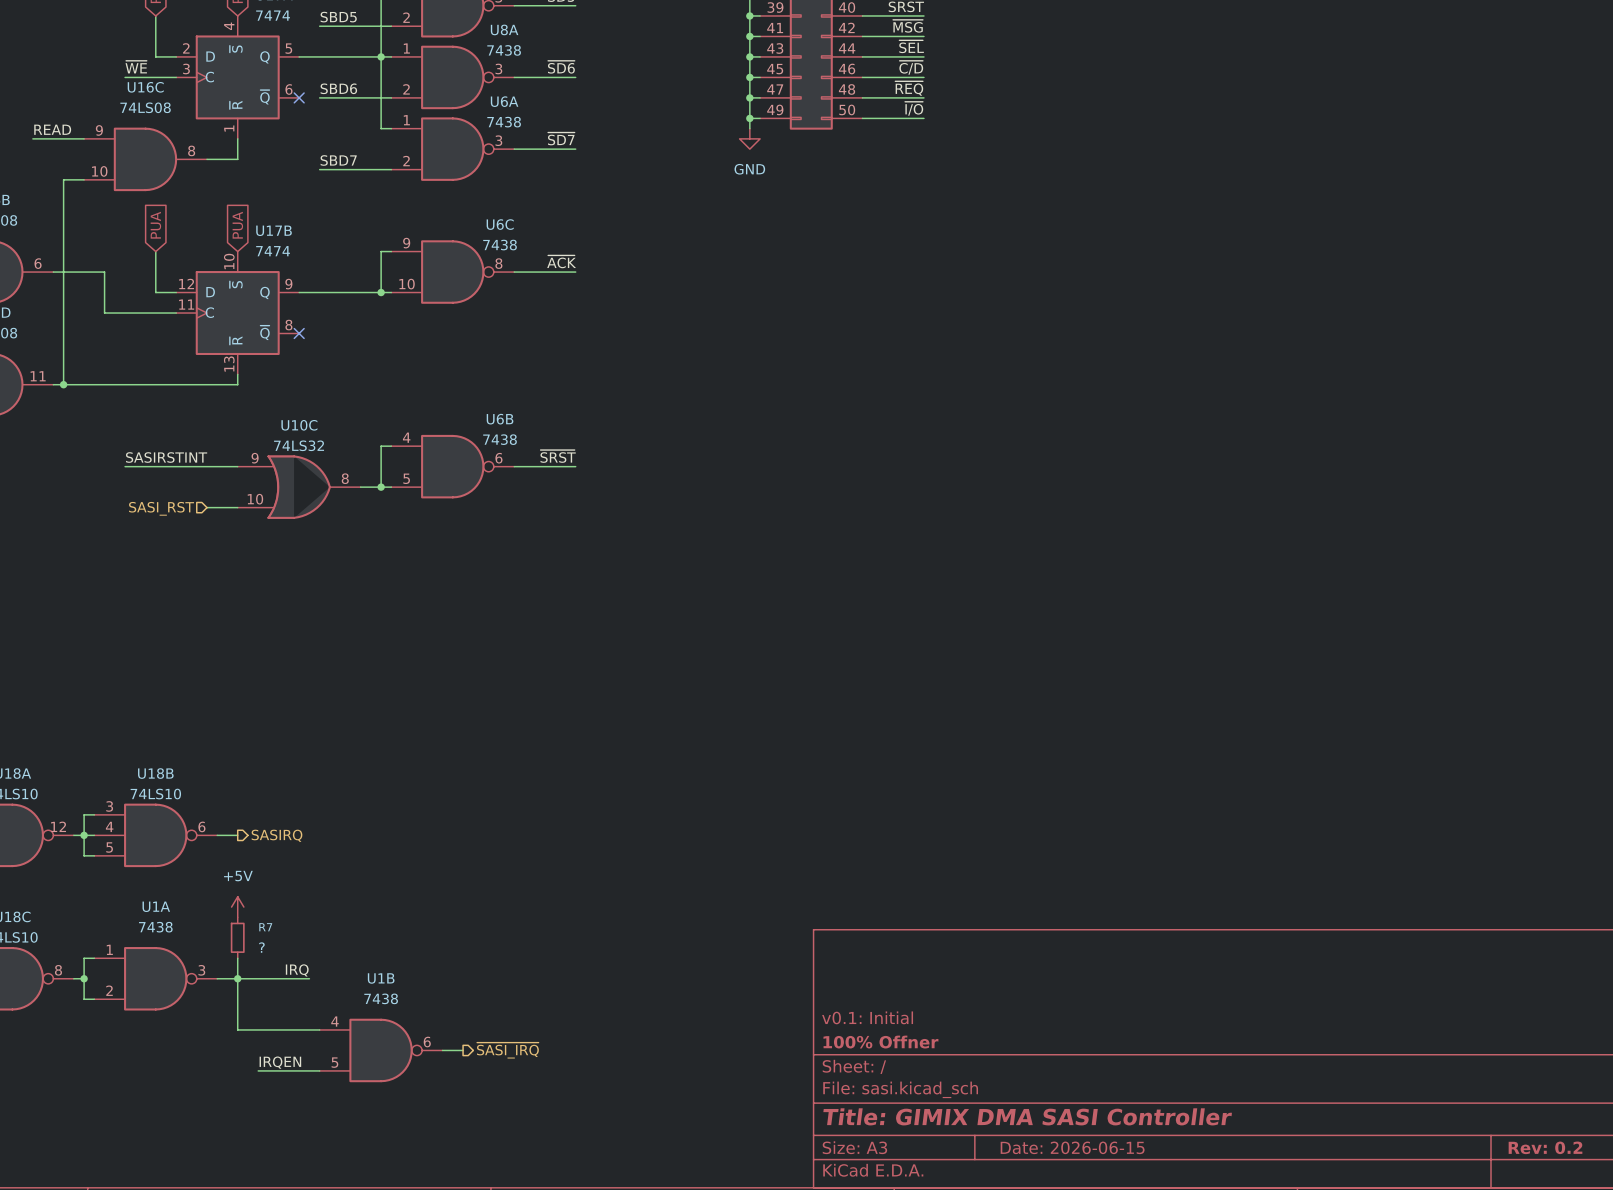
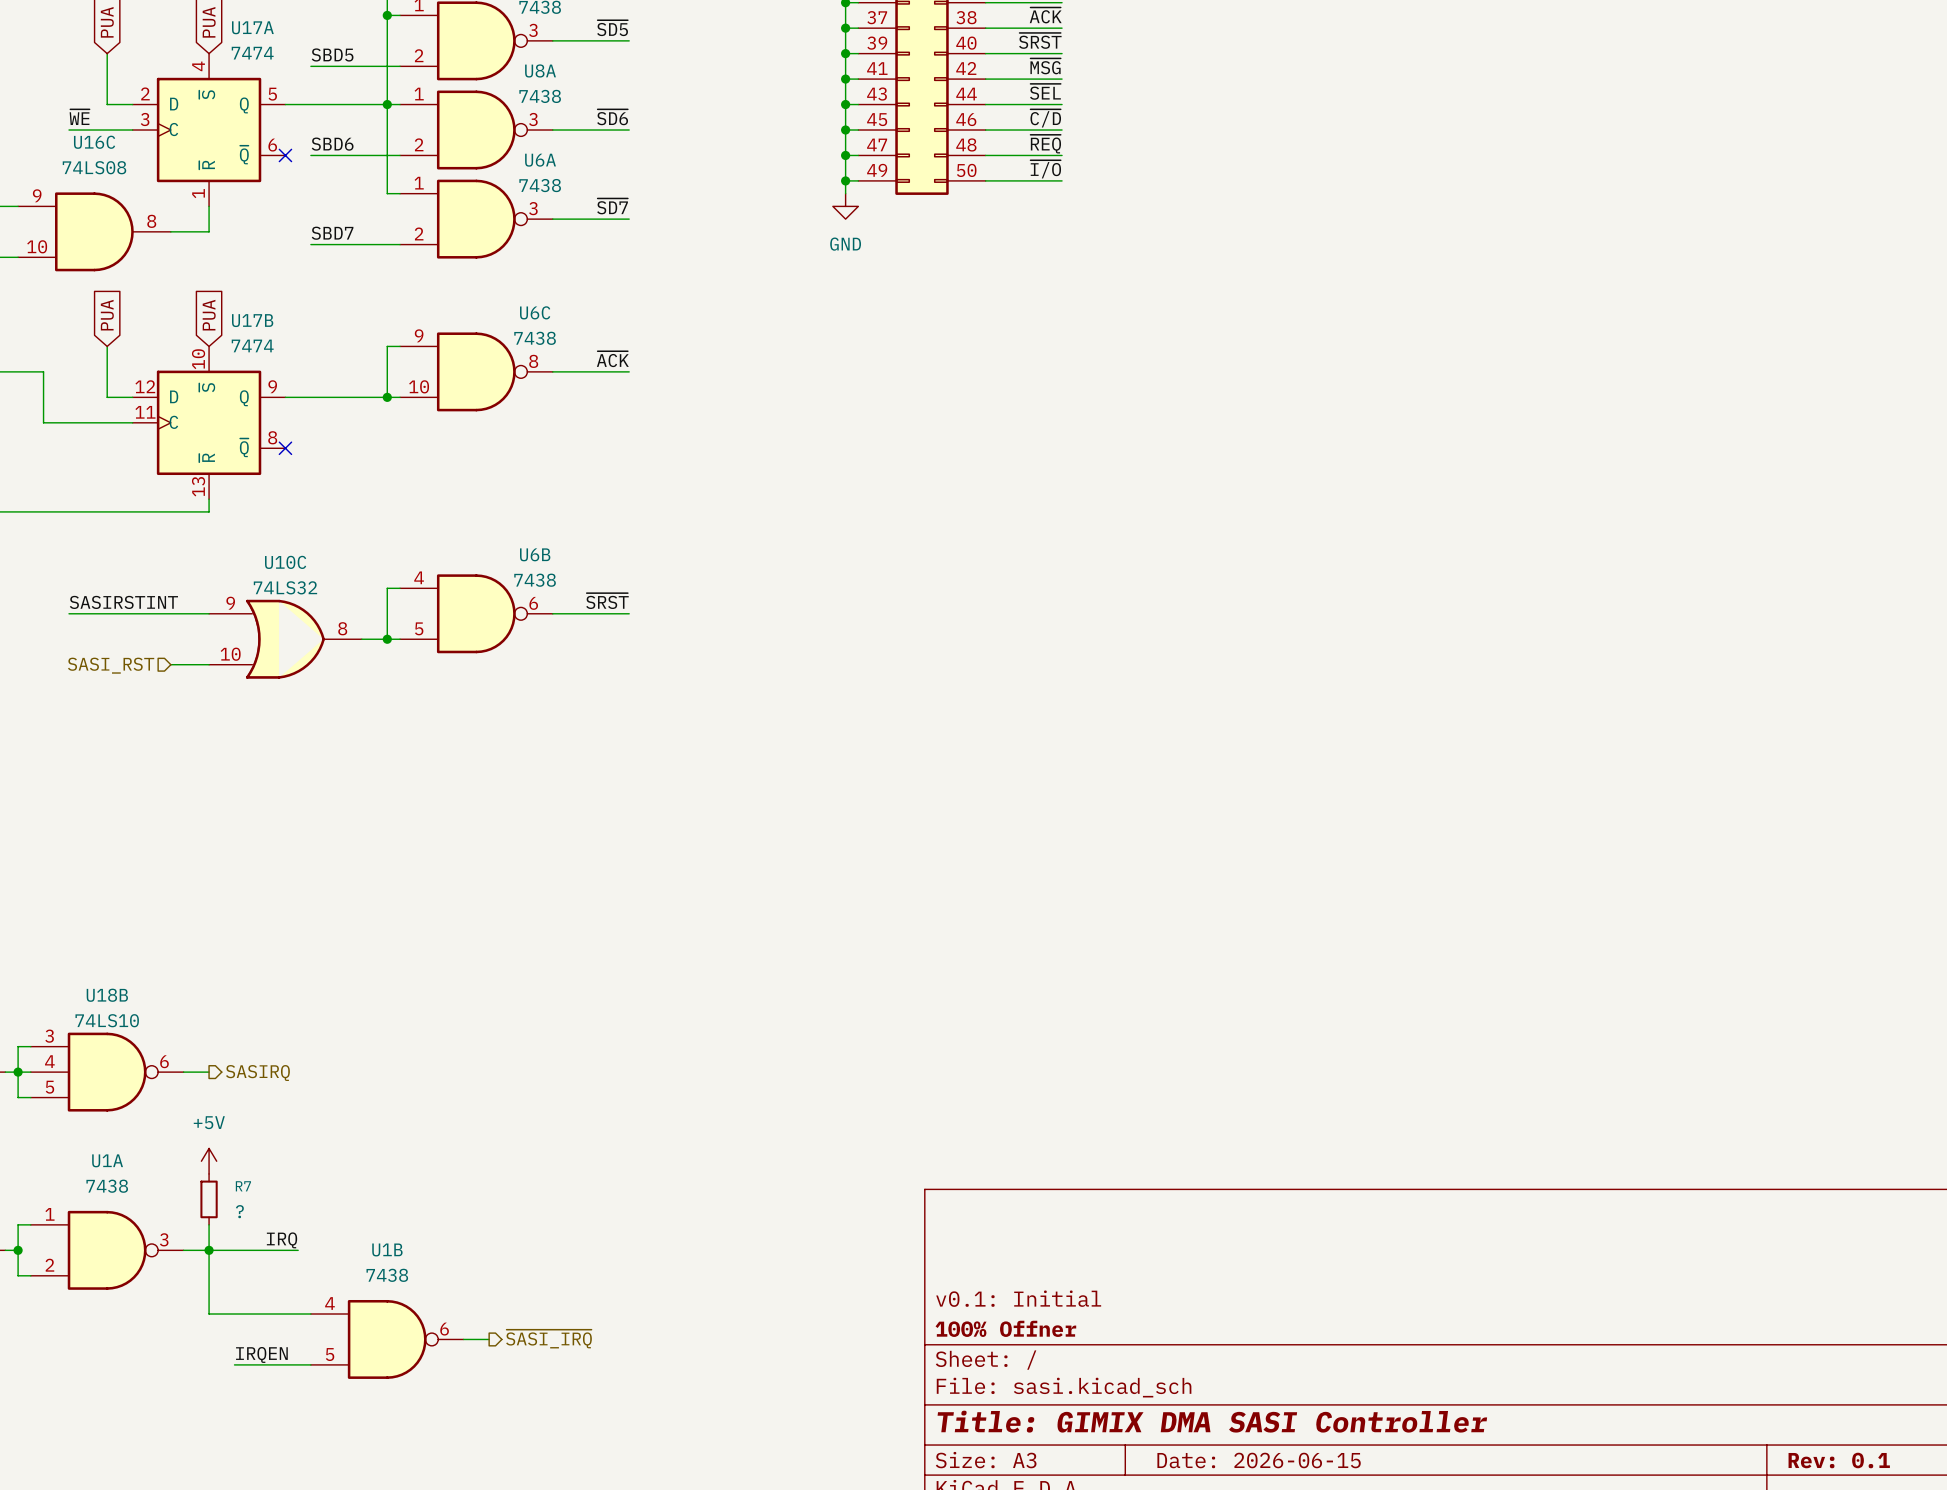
title block: Rev: 0.2 (1545, 1147) -> Rev: 0.1 (1839, 1460)

